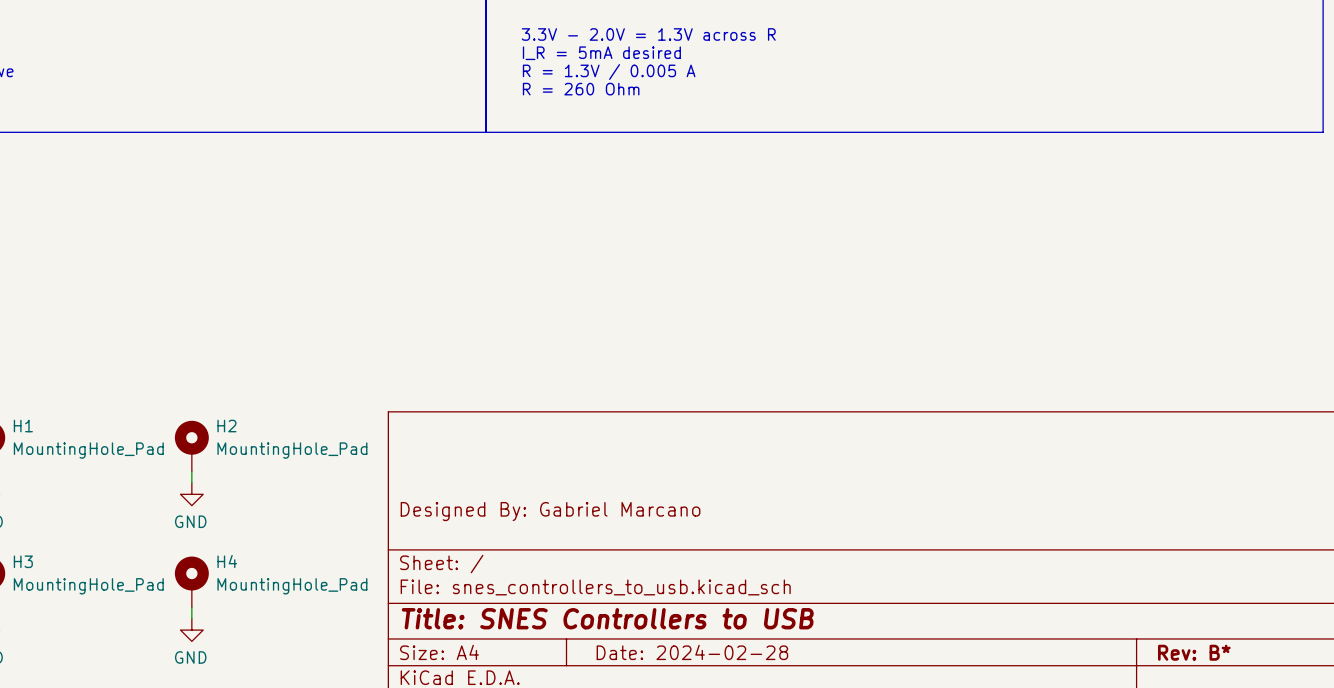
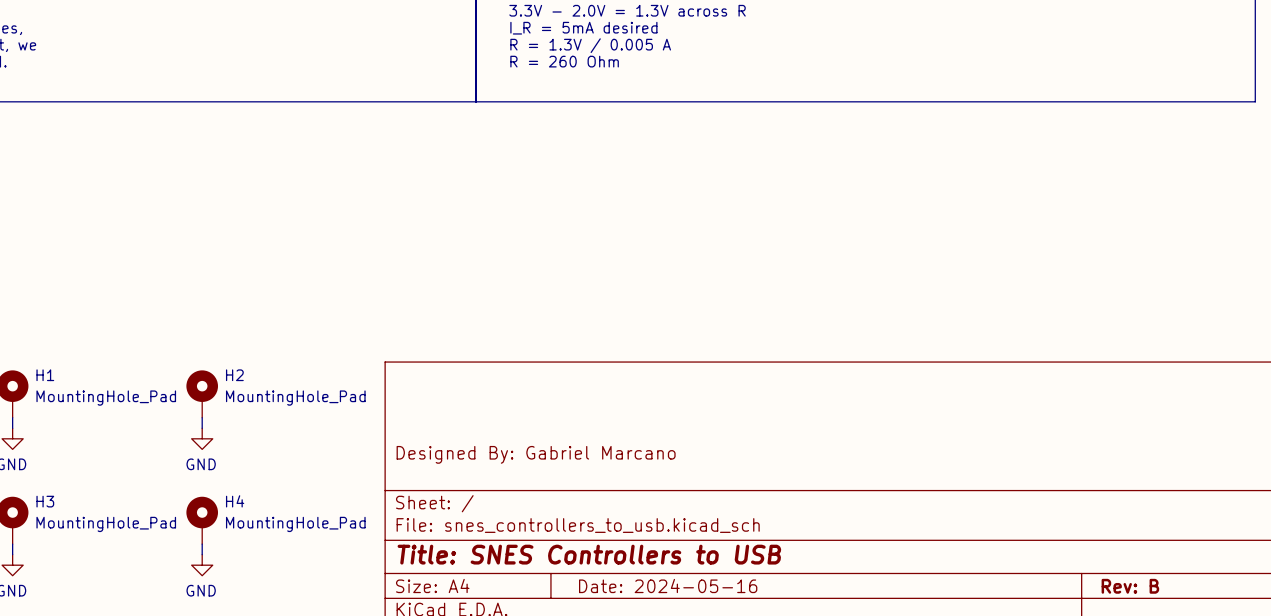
title block: Date: 2024-02-28 (692, 652) -> Date: 2024-05-16 (668, 585)
title block: Rev: B* (1194, 652) -> Rev: B (1130, 586)

